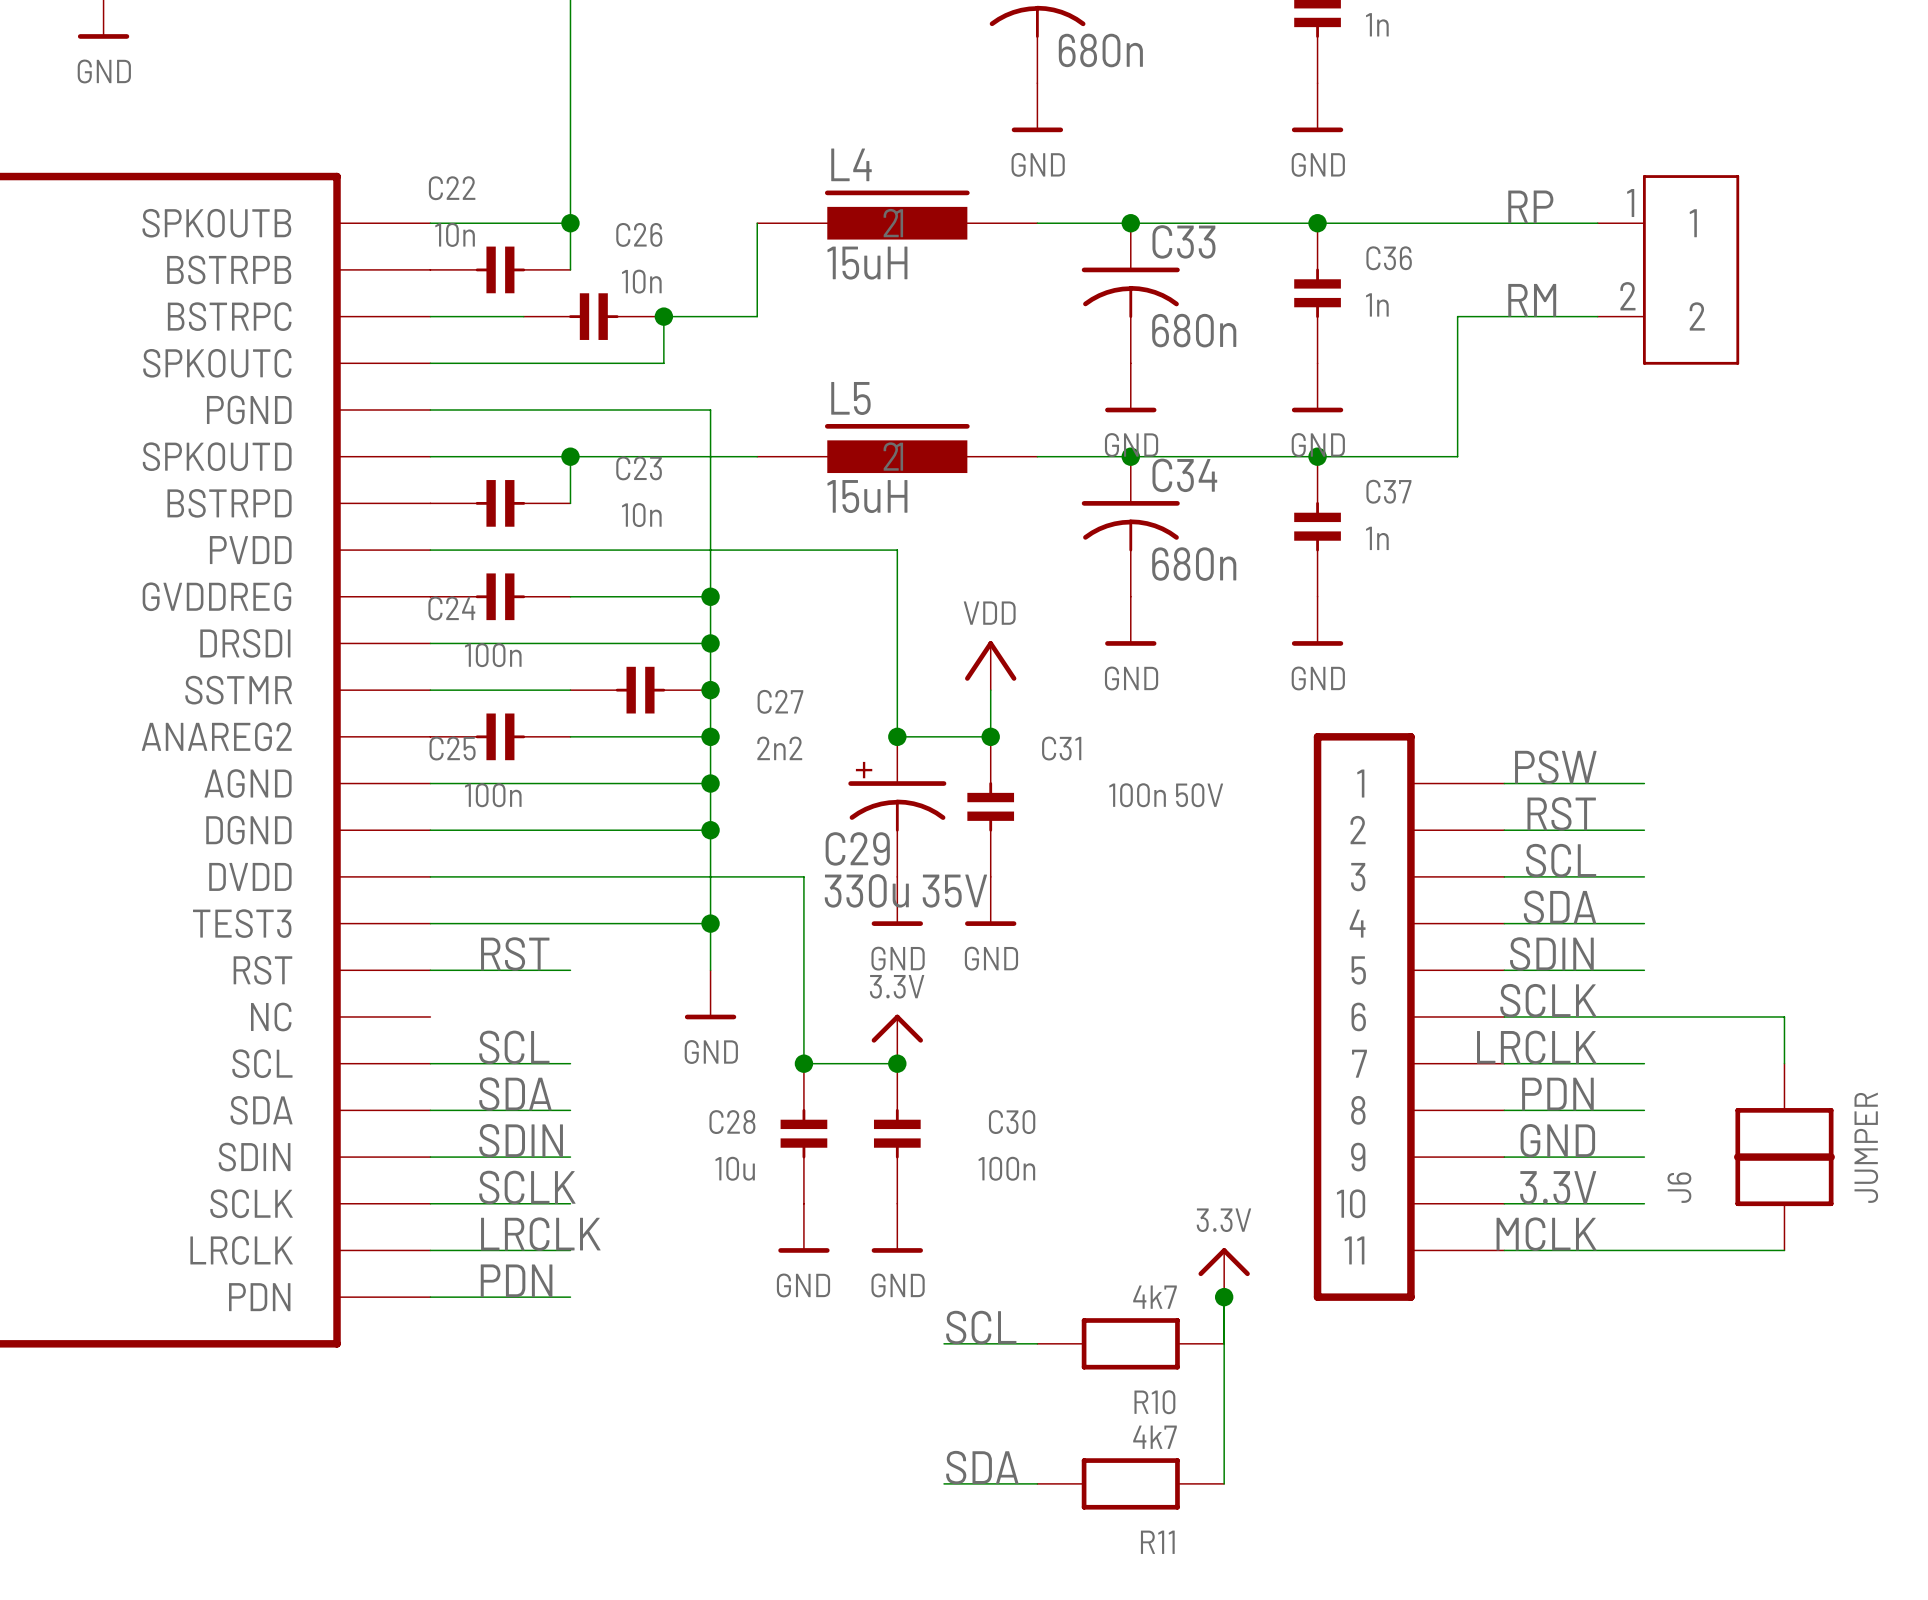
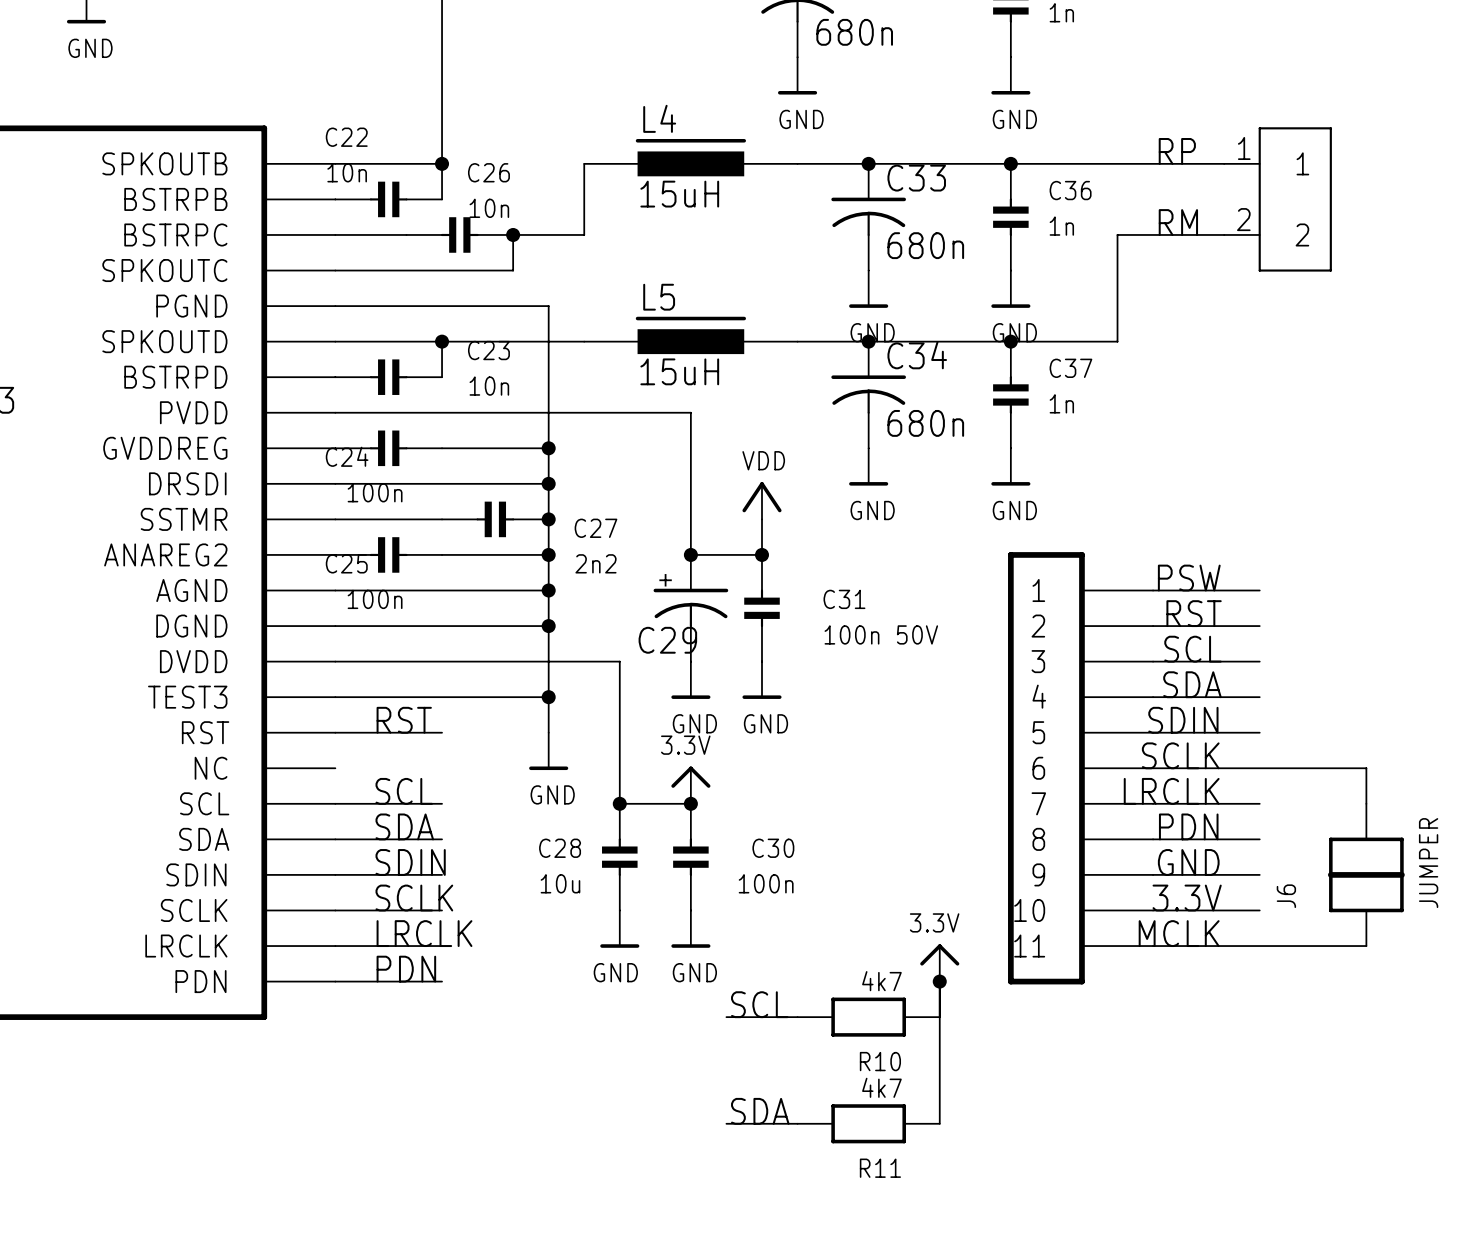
C31 name position: C31 (1061, 748) -> C31 (844, 599)
C31 value position: 100n 50V (1166, 795) -> 100n 50V (881, 634)
C29 value: 330u 35V (905, 890) -> none

